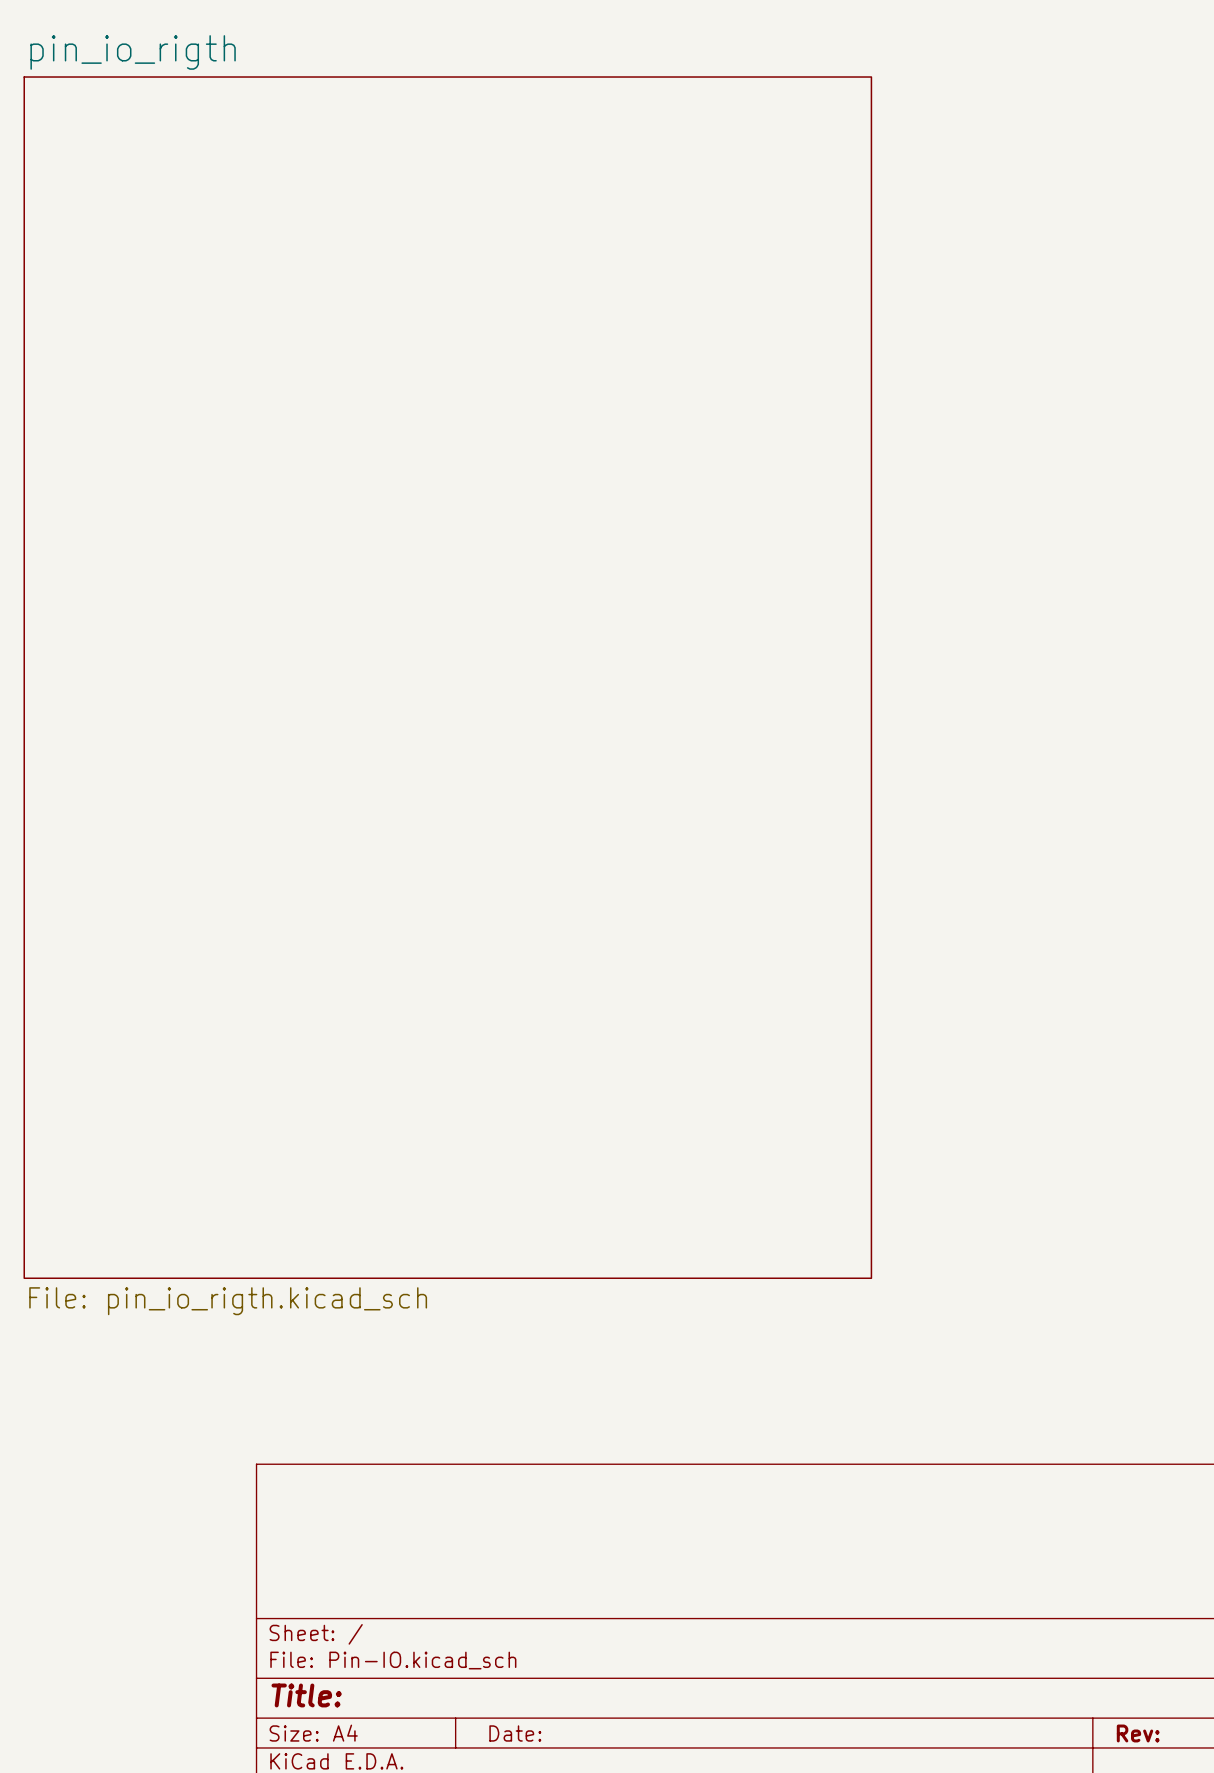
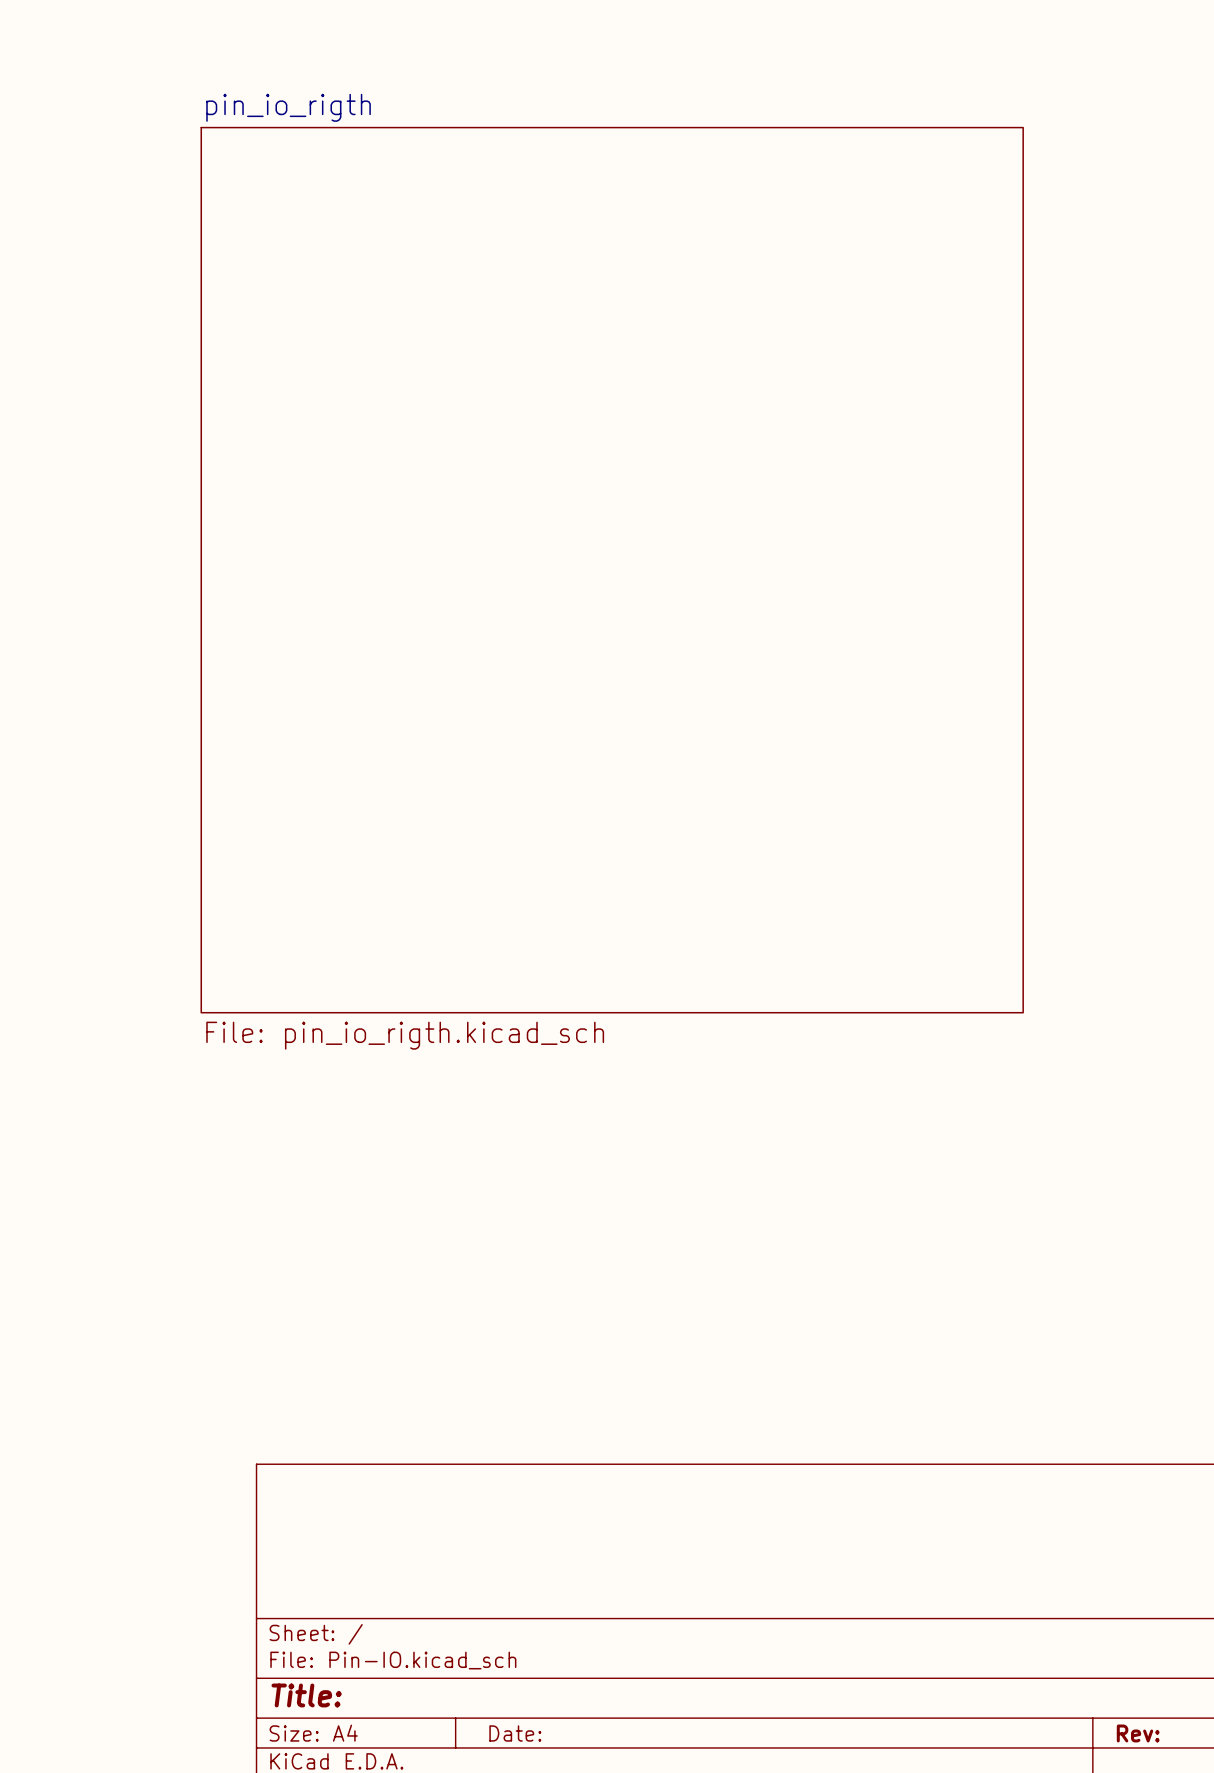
sheet pin_io_rigth: none -> File: pin_io_rigth.kicad_sch (612, 570)
sheet pin_io_rigth: File: pin_io_rigth.kicad_sch (447, 677) -> none

